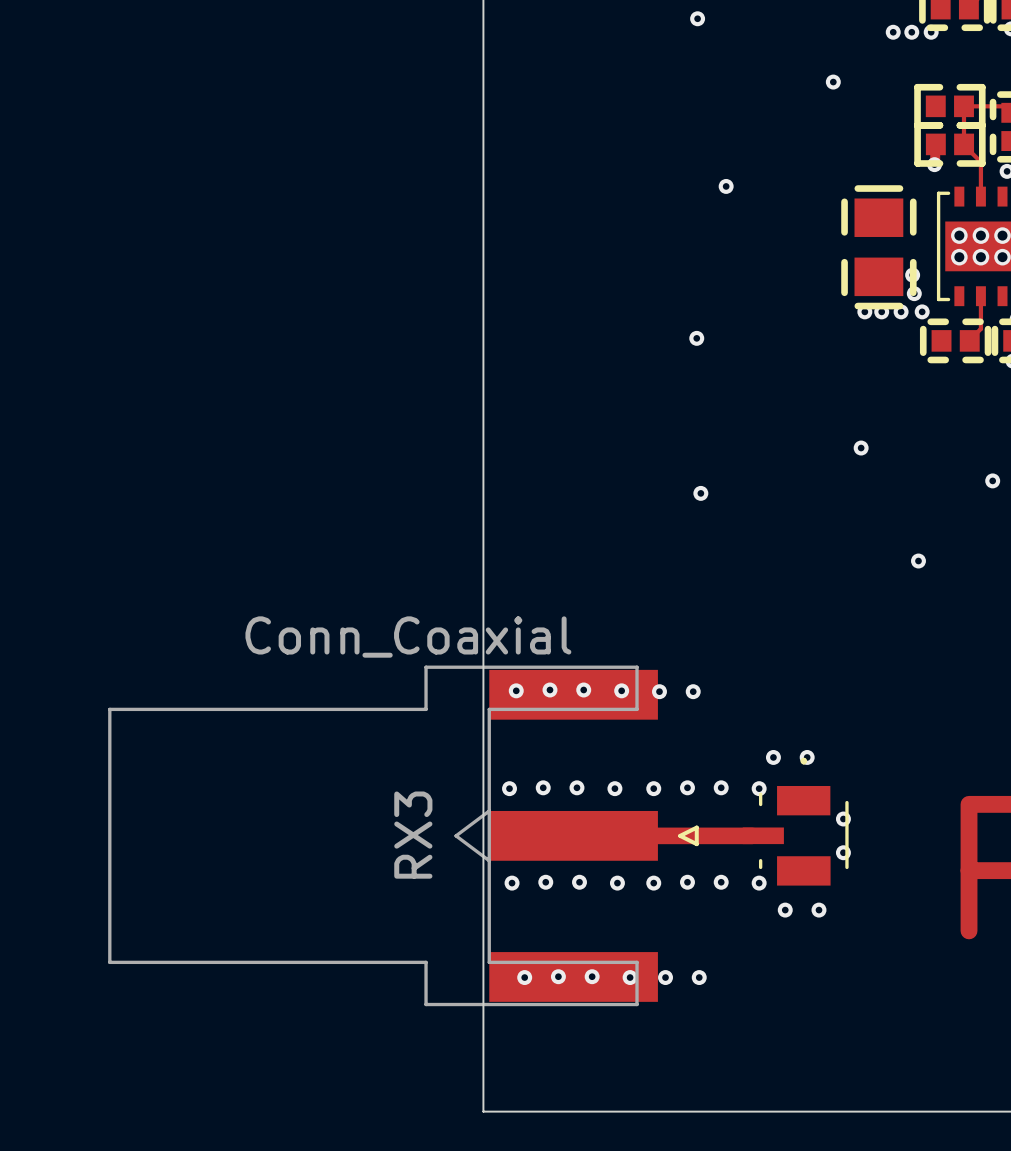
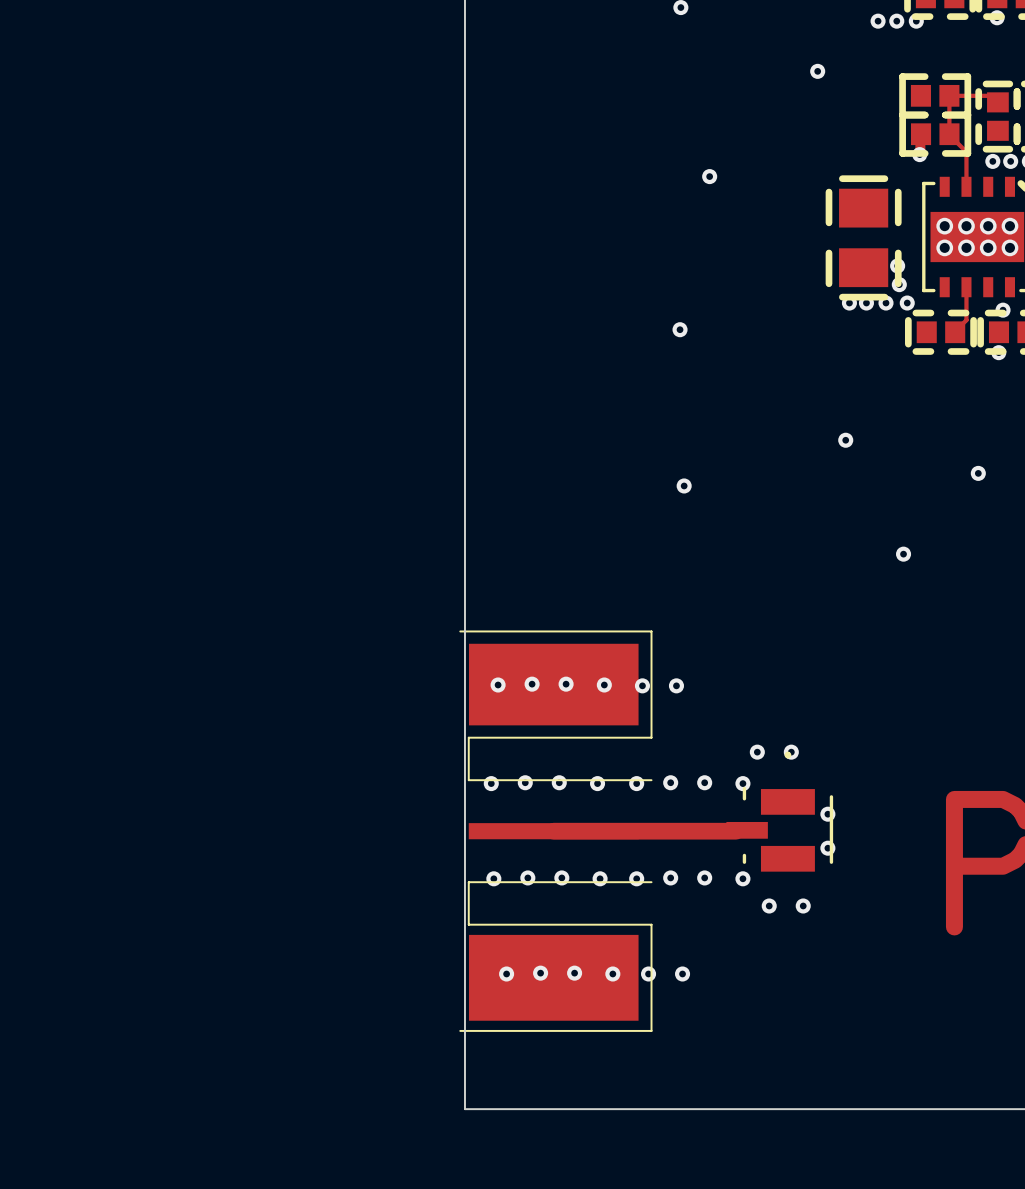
part footprint: [742, 757, 849, 886] -> [726, 751, 834, 872]
RX3: Conn_Coaxial (403, 835) -> none
part: none -> (555, 831)

